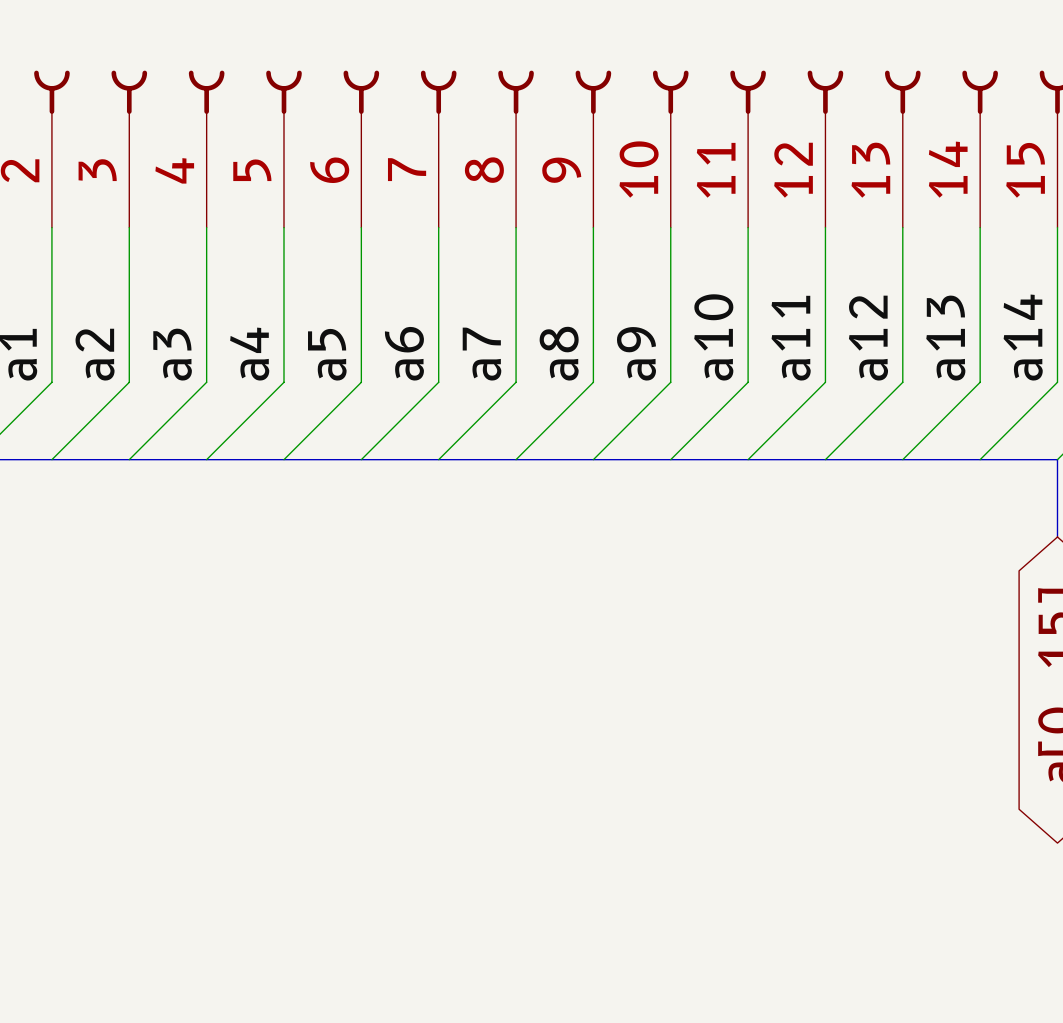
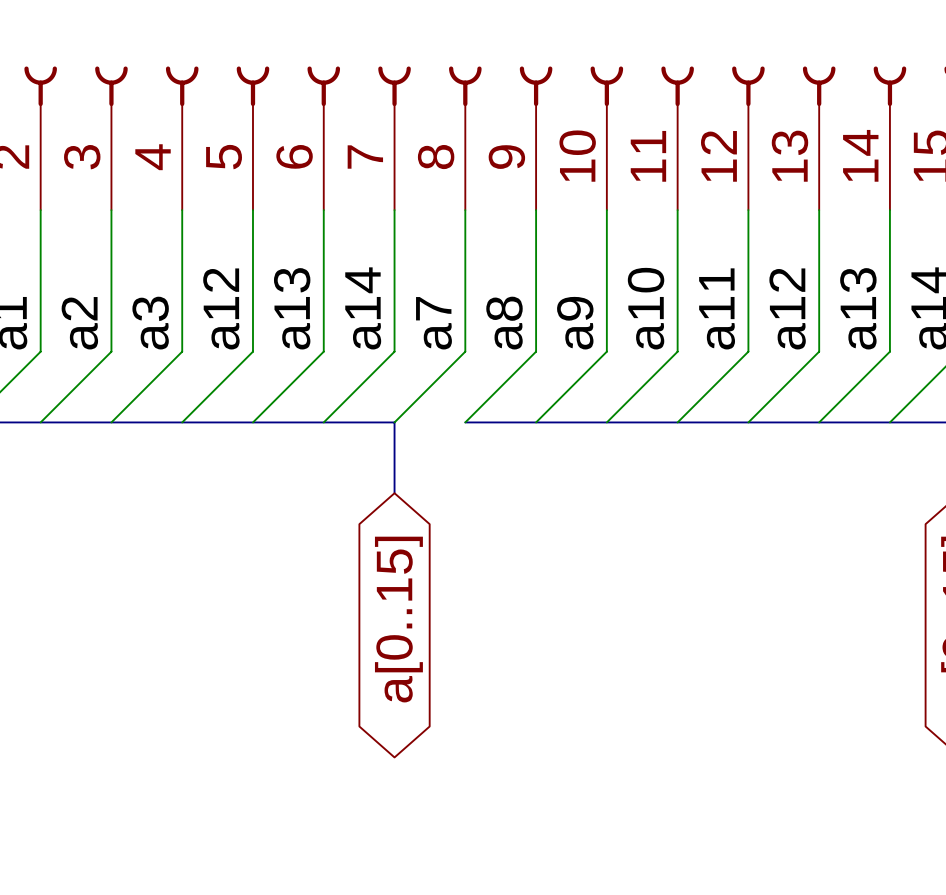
label: a6 (404, 353) -> a14 (363, 308)
label: a4 (249, 354) -> a12 (221, 308)
label: a5 (327, 354) -> a13 (292, 308)
bus: (438, 459) (516, 459) -> (394, 422) (394, 493)
global label: none -> a[0..15] (398, 619)

